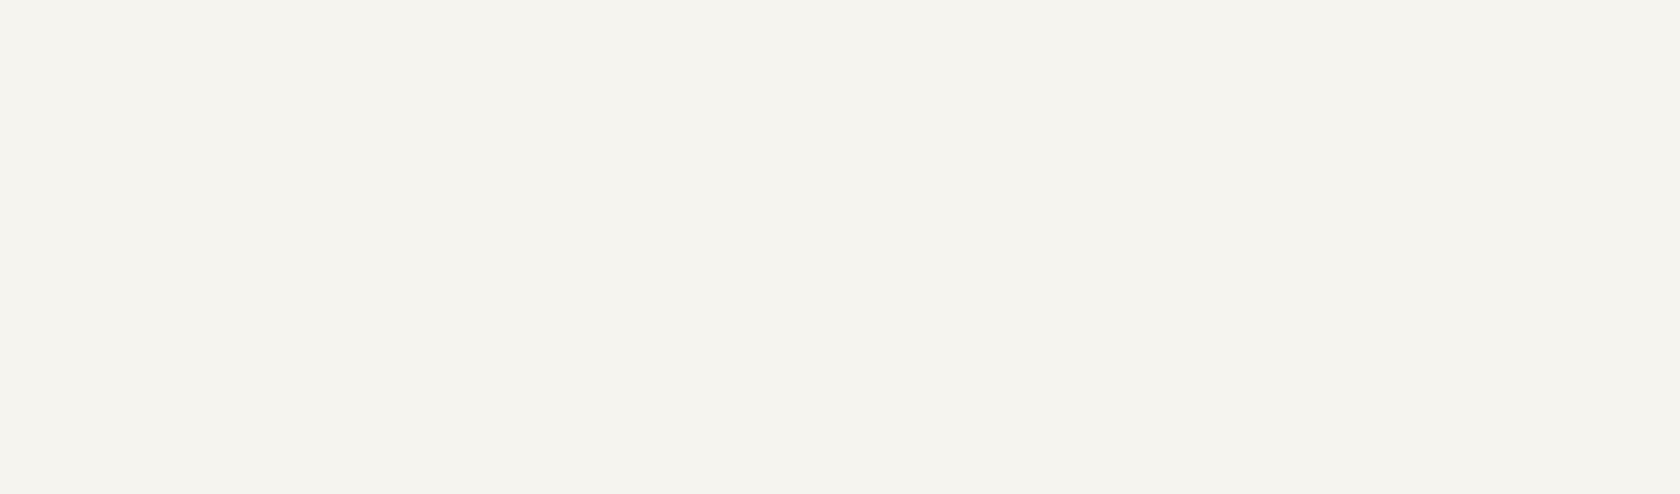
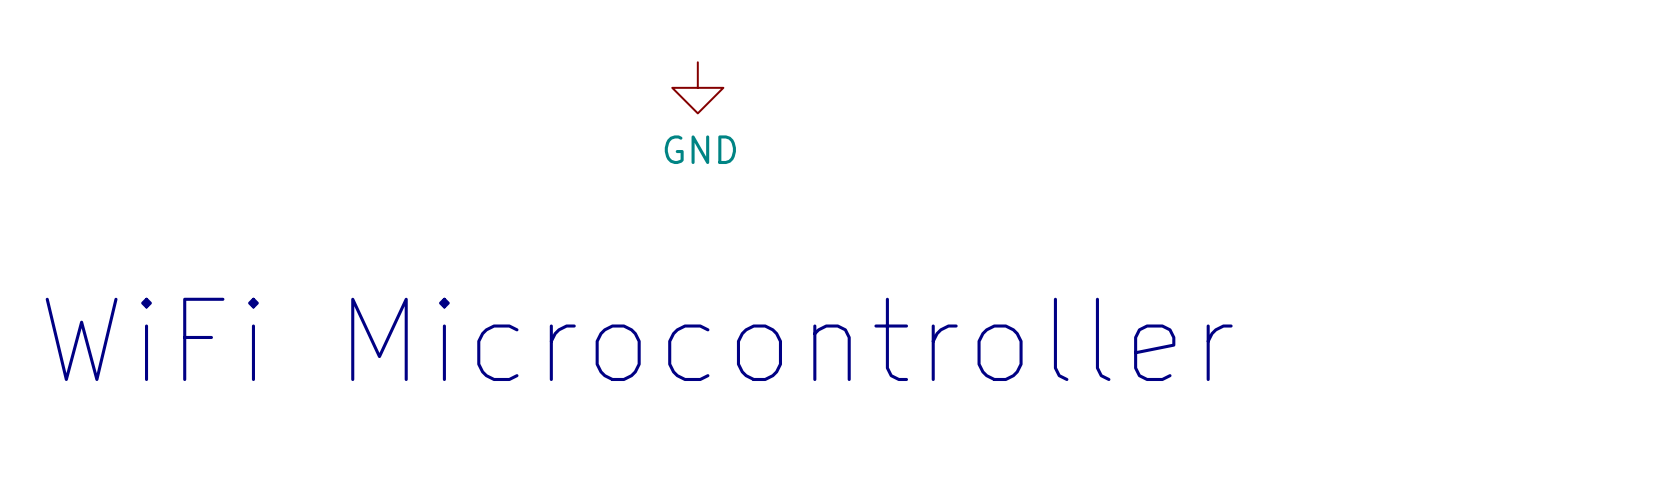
power symbol: none -> GND (697, 87)
text: none -> WiFi Microcontroller (639, 339)

